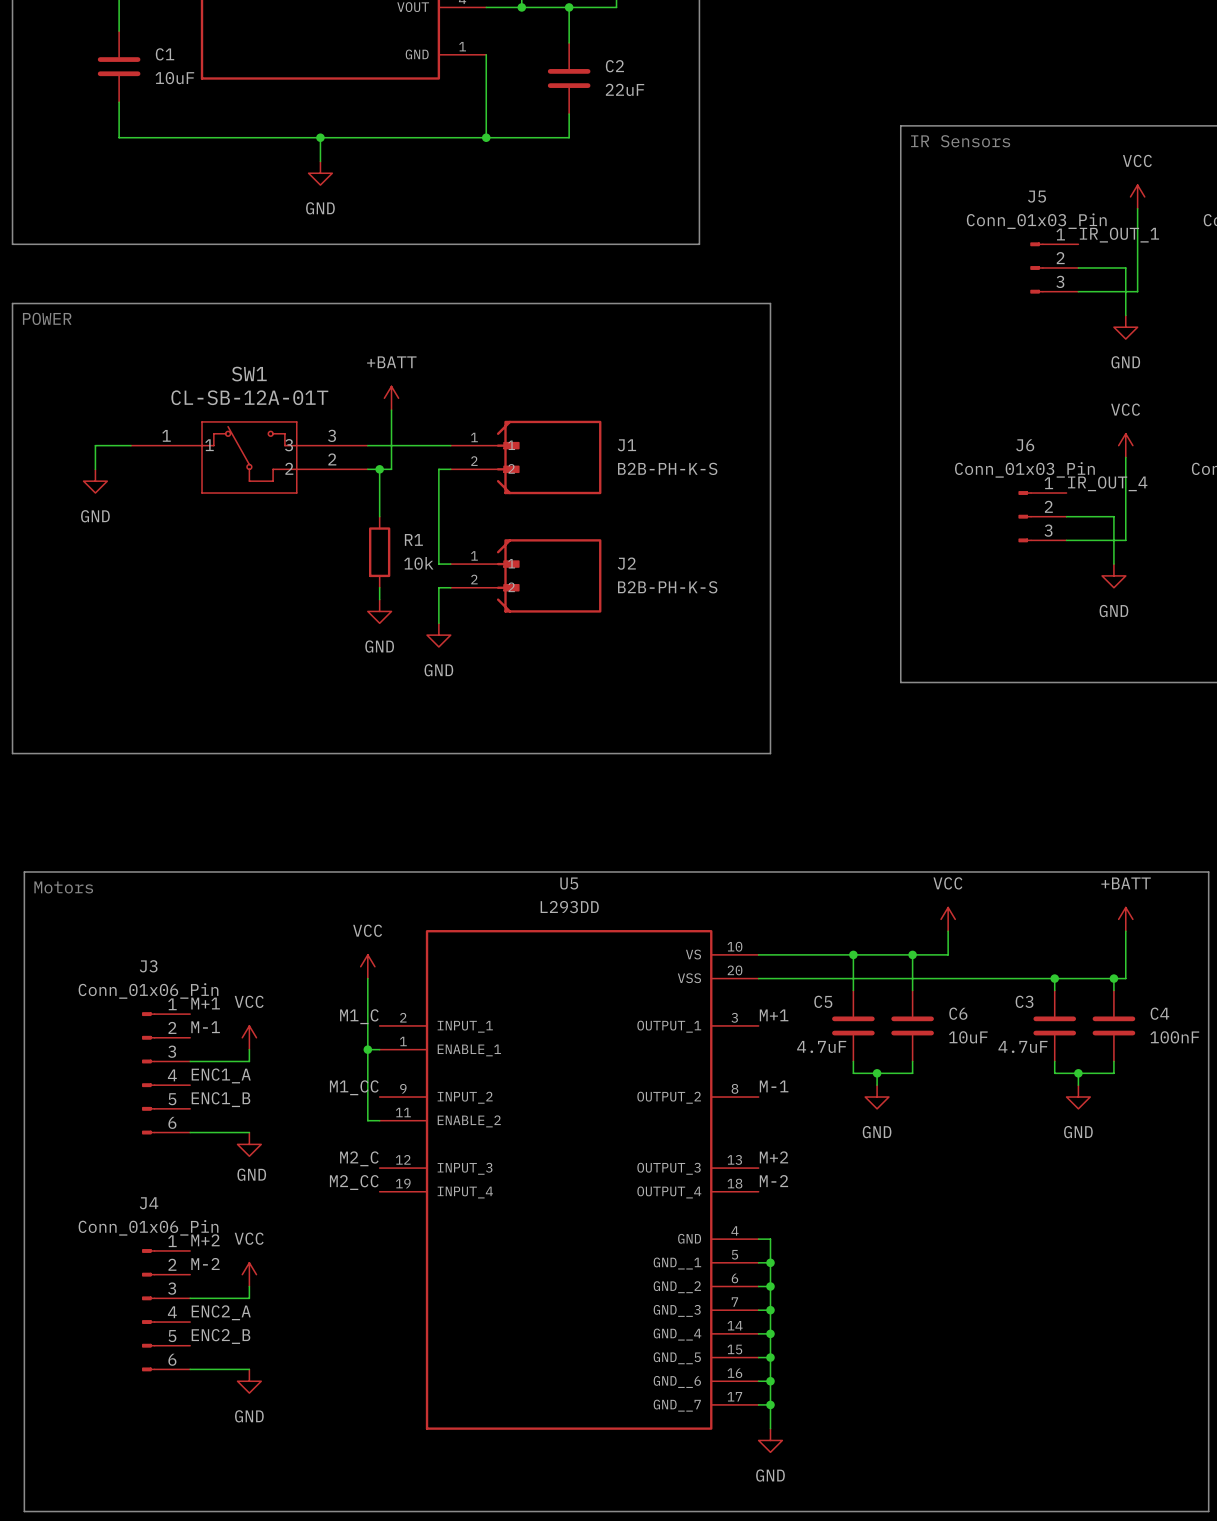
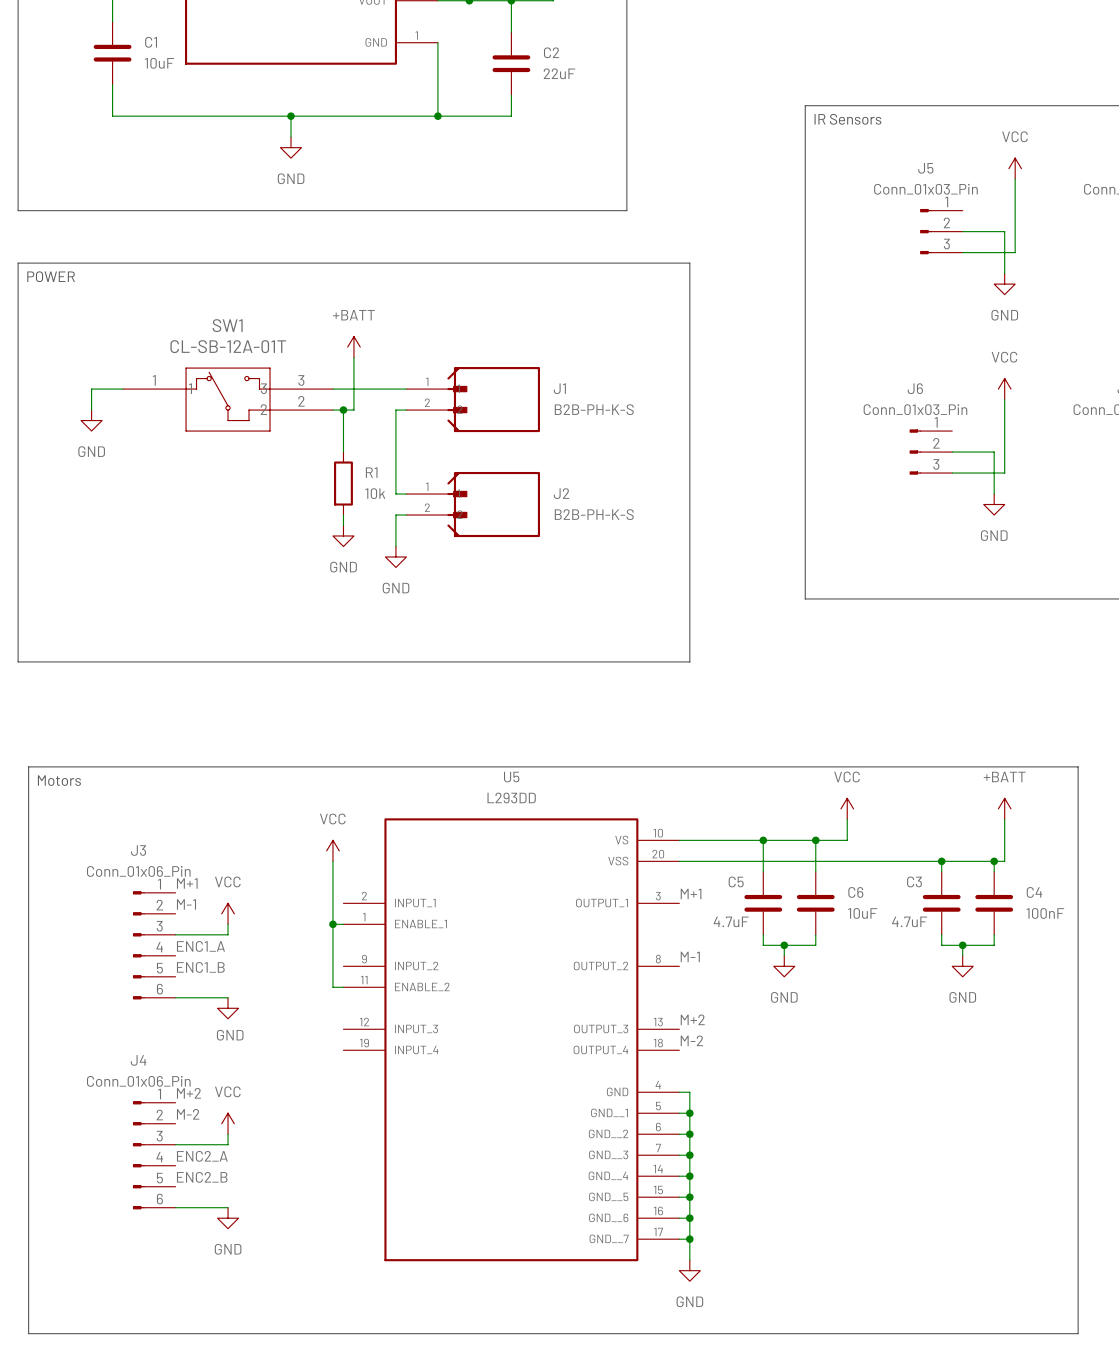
label: IR_OUT_1 (1119, 235) -> none
label: IR_OUT_4 (1107, 483) -> none
label: M1_C (359, 1016) -> none
label: M1_CC (354, 1087) -> none
label: M2_C (359, 1158) -> none
label: M2_CC (354, 1182) -> none

